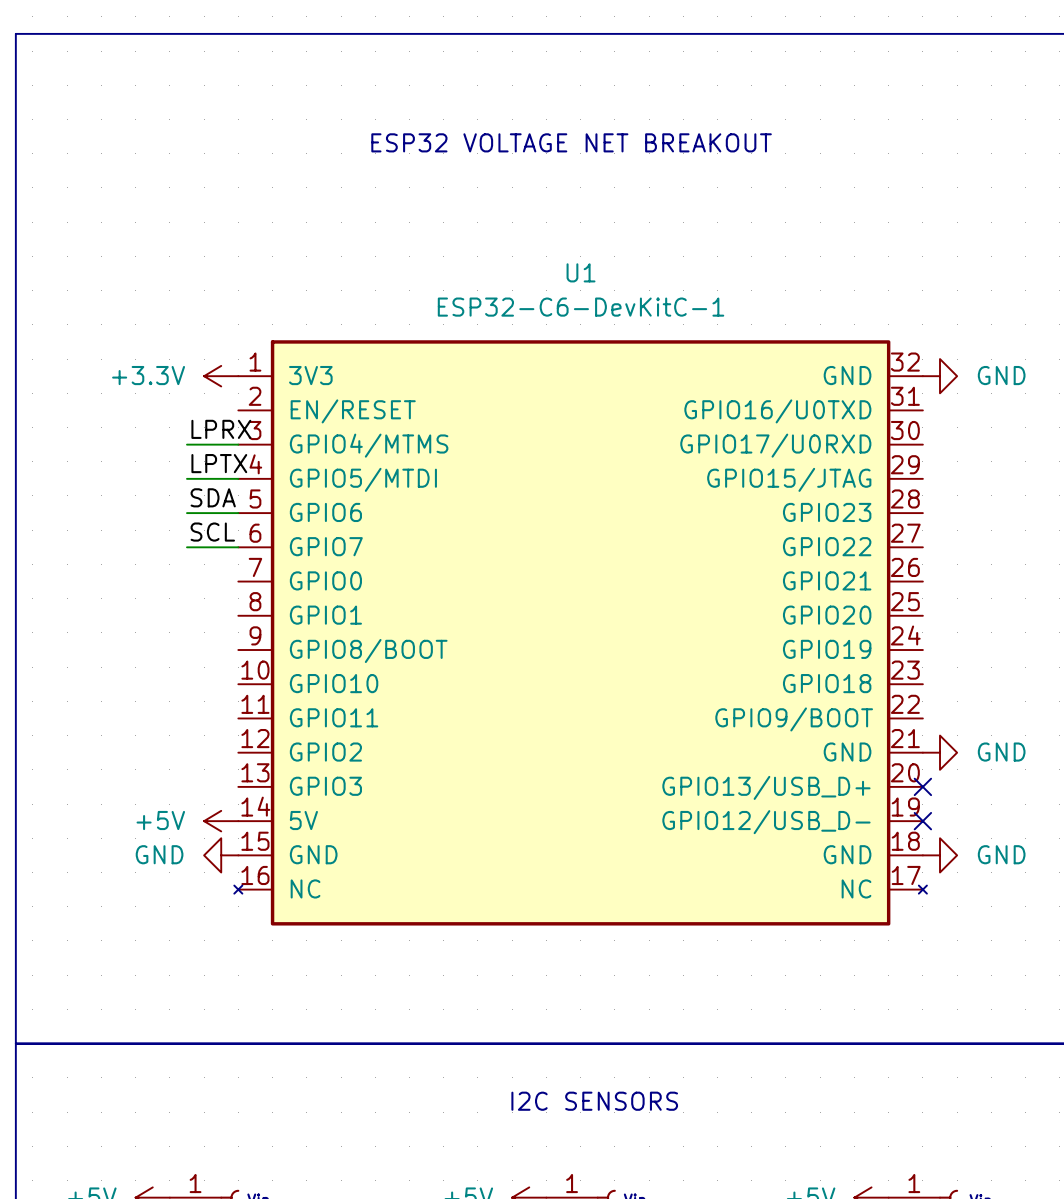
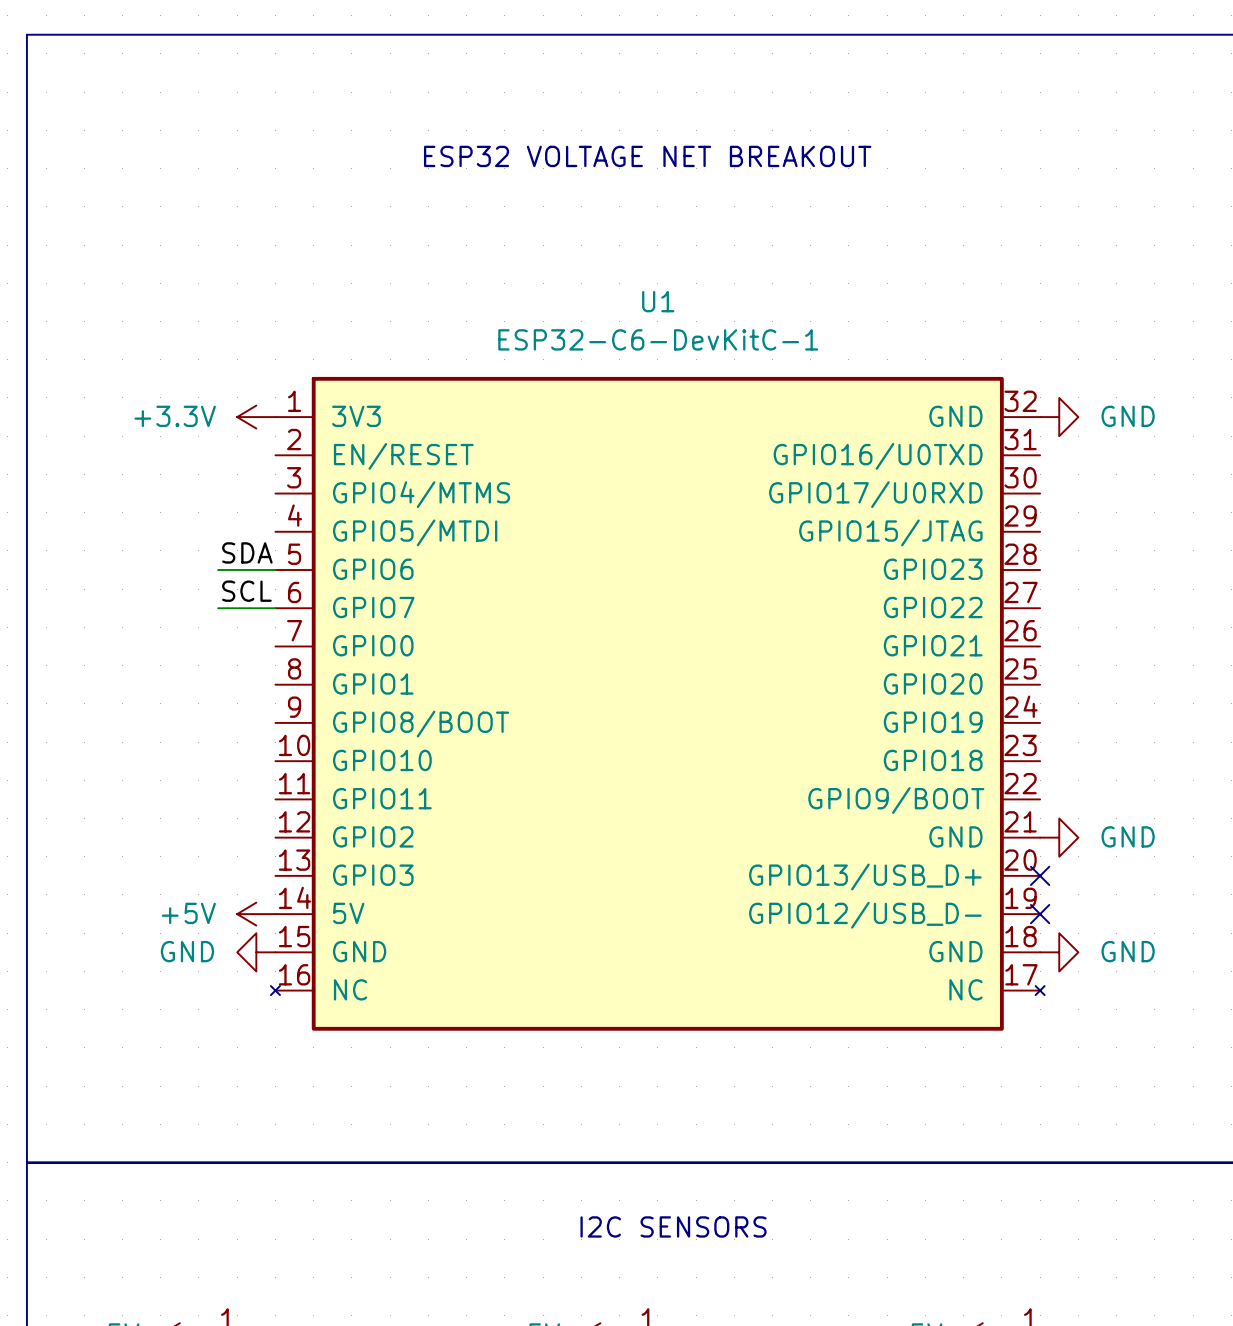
label: LPRX (221, 429) -> none
wire: (186, 444) (238, 444) -> none
label: LPTX (219, 463) -> none
wire: (186, 478) (238, 478) -> none

